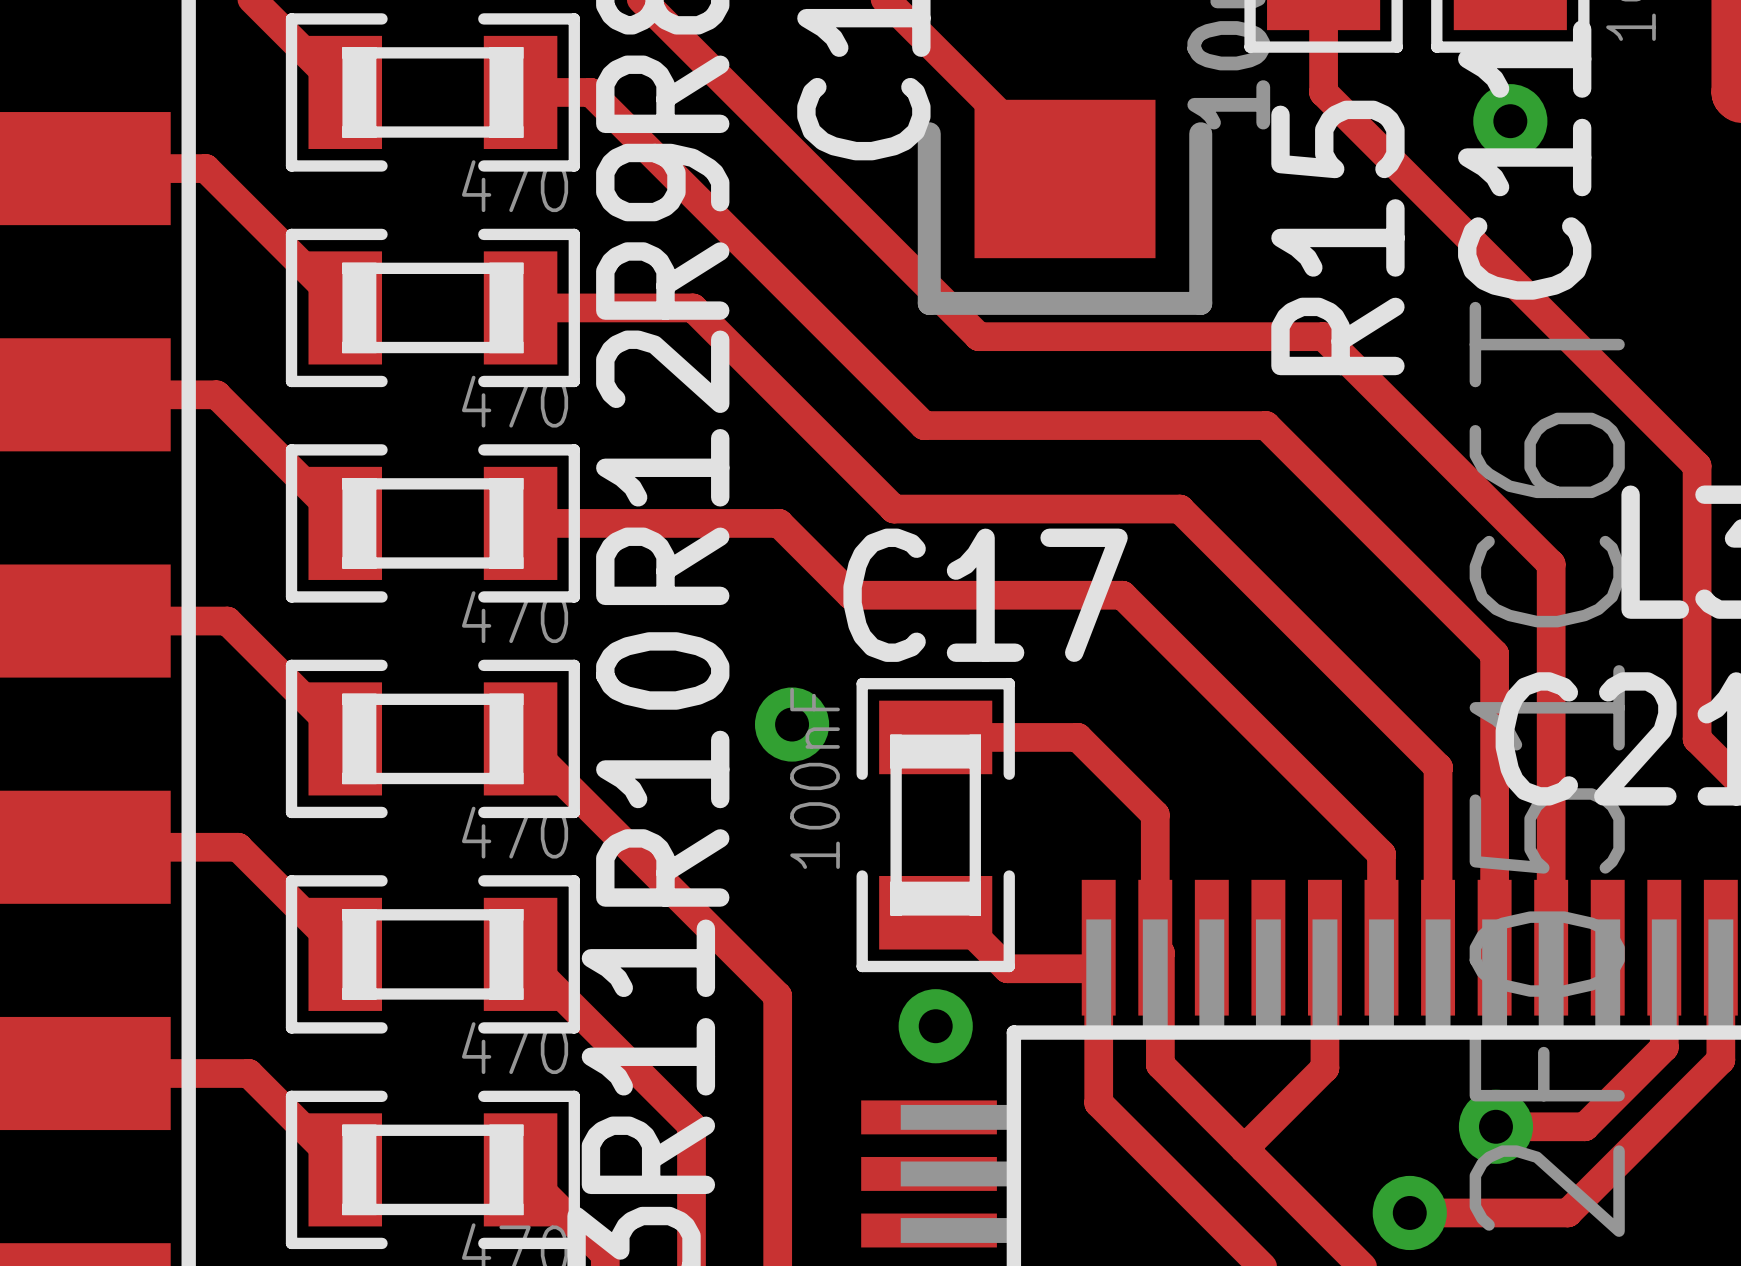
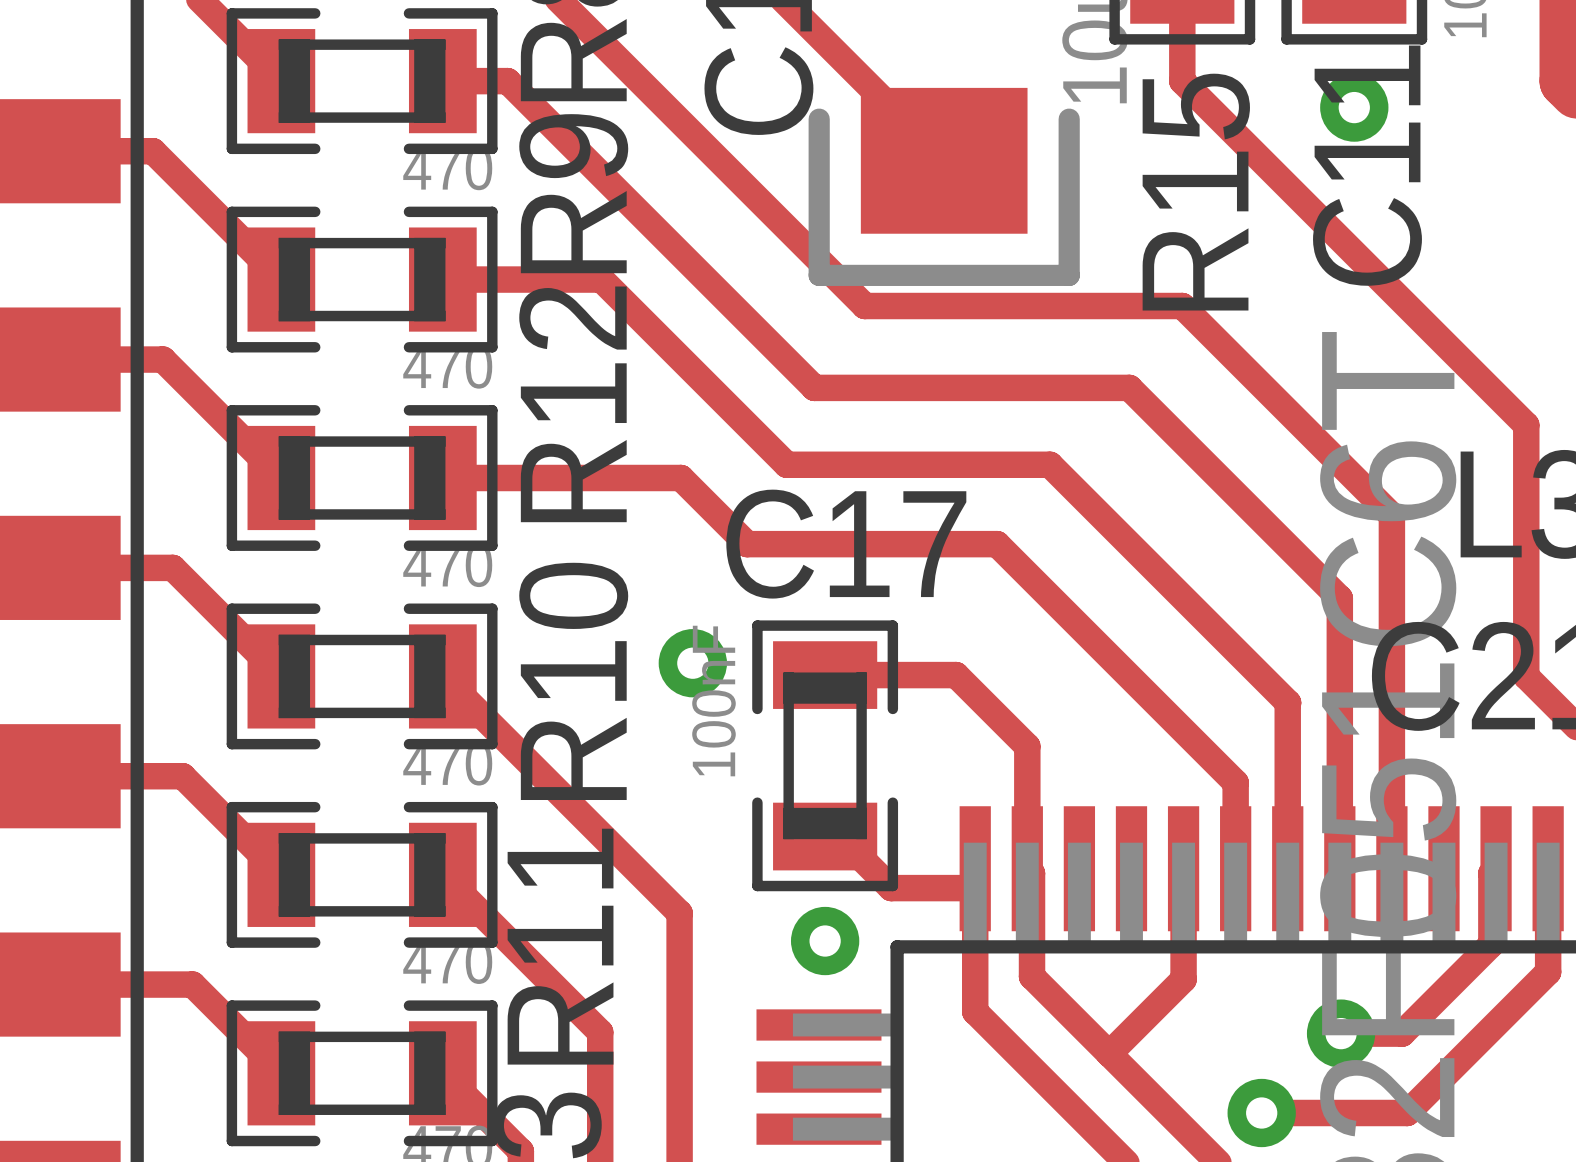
track: (1664, 947) (1664, 1047) (1584, 1126) (1562, 1126) -> (1496, 868) (1491, 873) (1491, 944) (1402, 1033)

